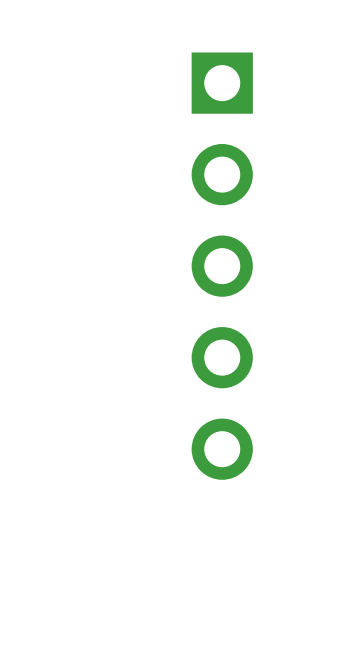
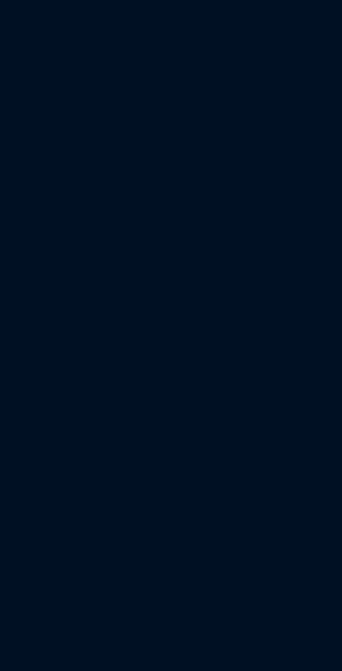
part: (222, 266) -> none

